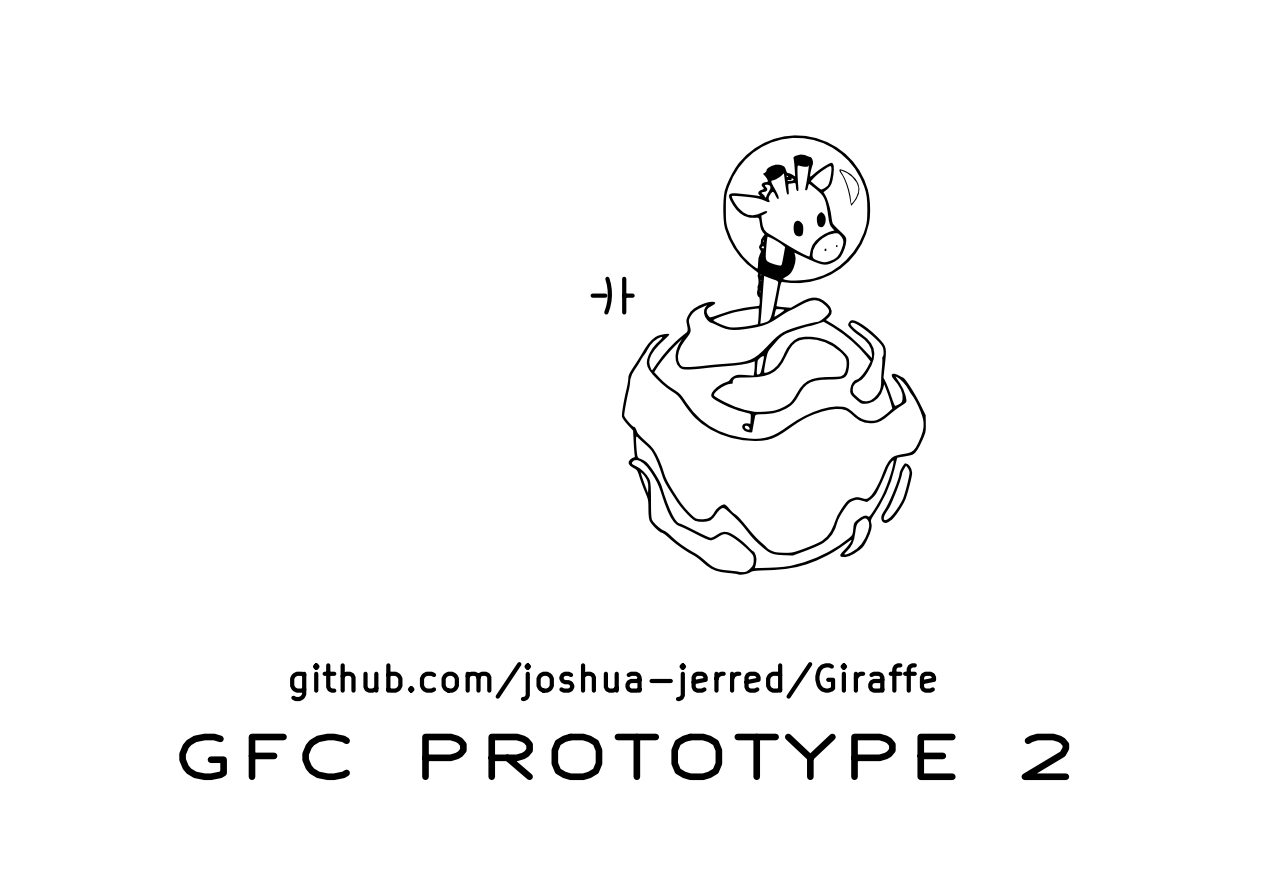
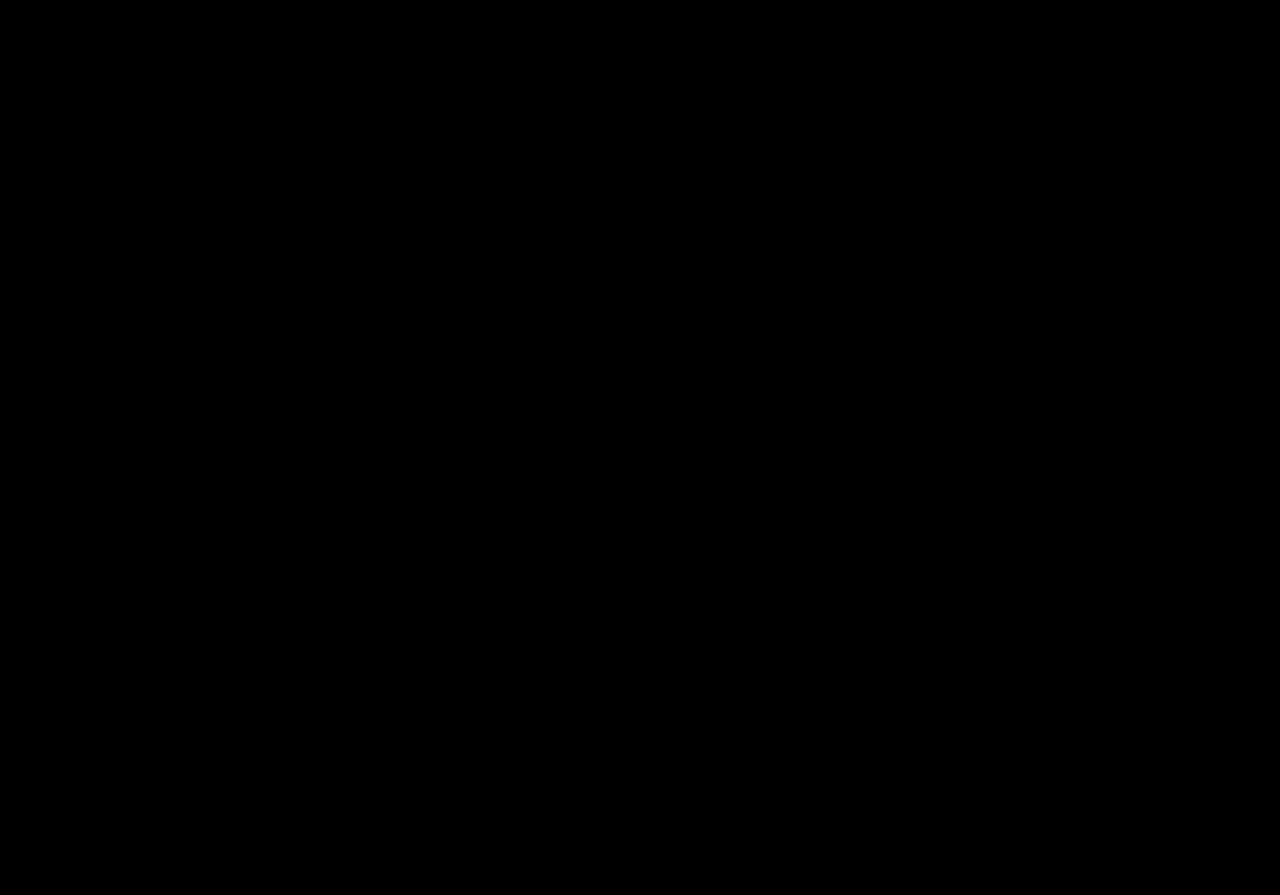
drawing: [621, 135, 926, 575] -> none
line: (607, 278) (609, 295) (606, 312) -> none
line: (624, 278) (624, 312) -> none
line: (592, 295) (605, 295) -> none
line: (624, 295) (632, 295) -> none
text: github.com/joshua-jerred/Giraffe (613, 681) -> none
text: GFC PROTOTYPE 2 (624, 756) -> none

